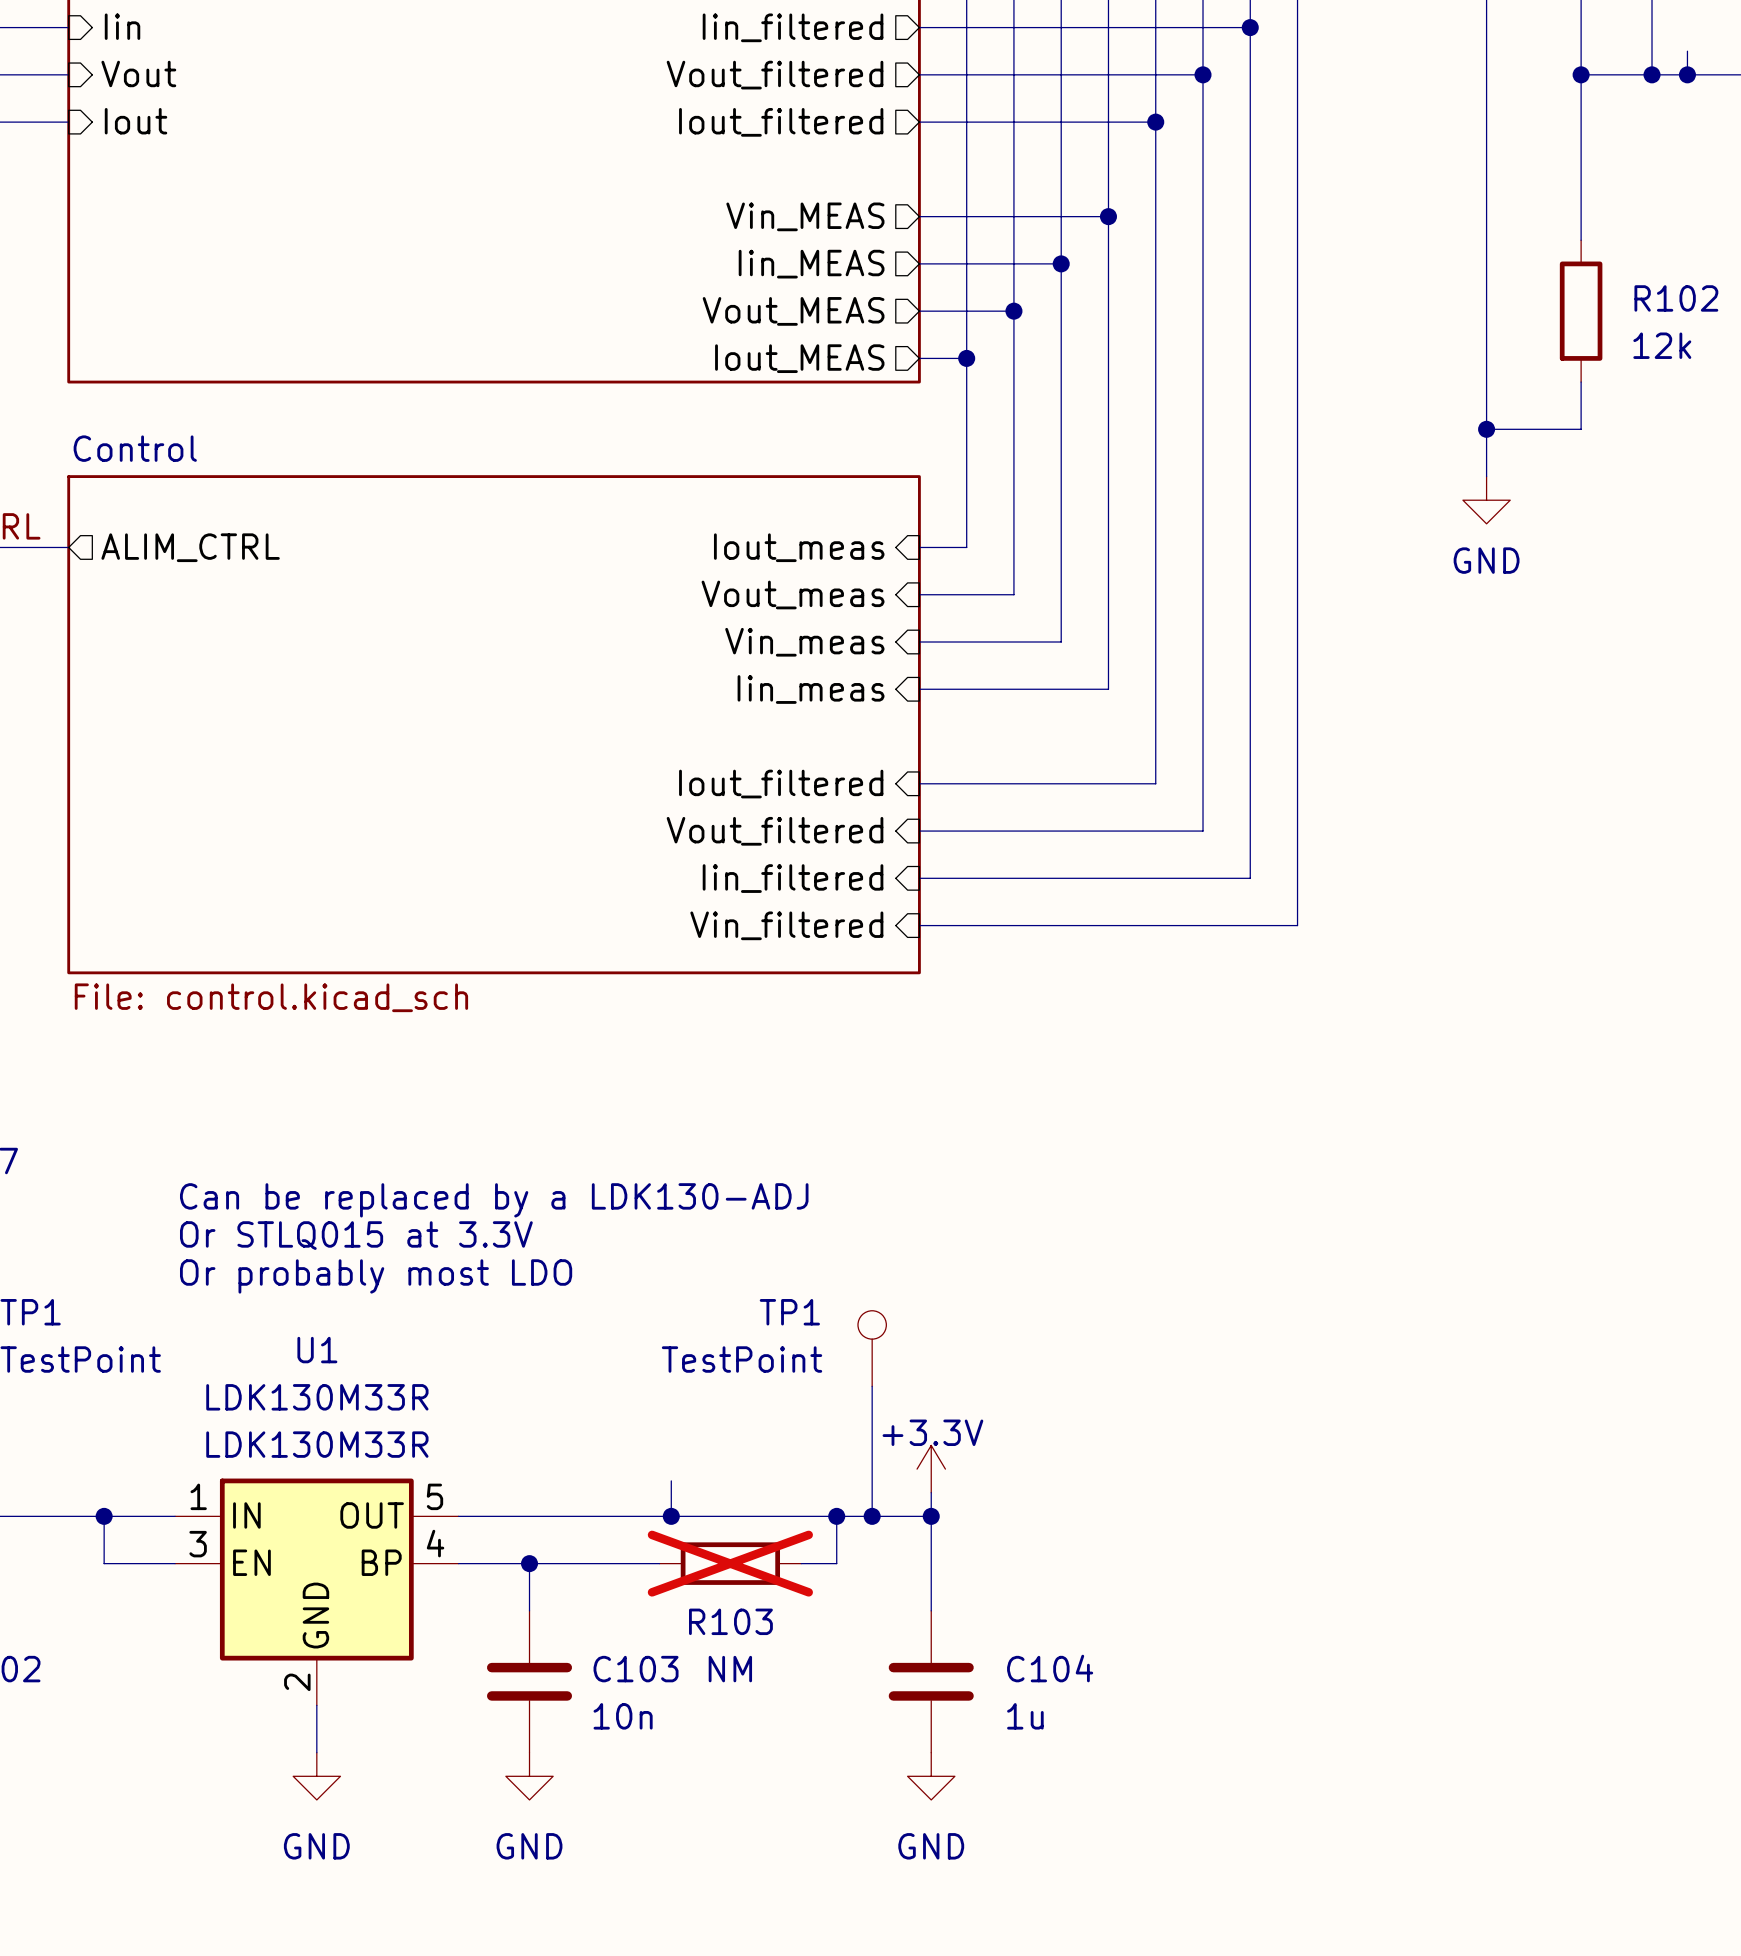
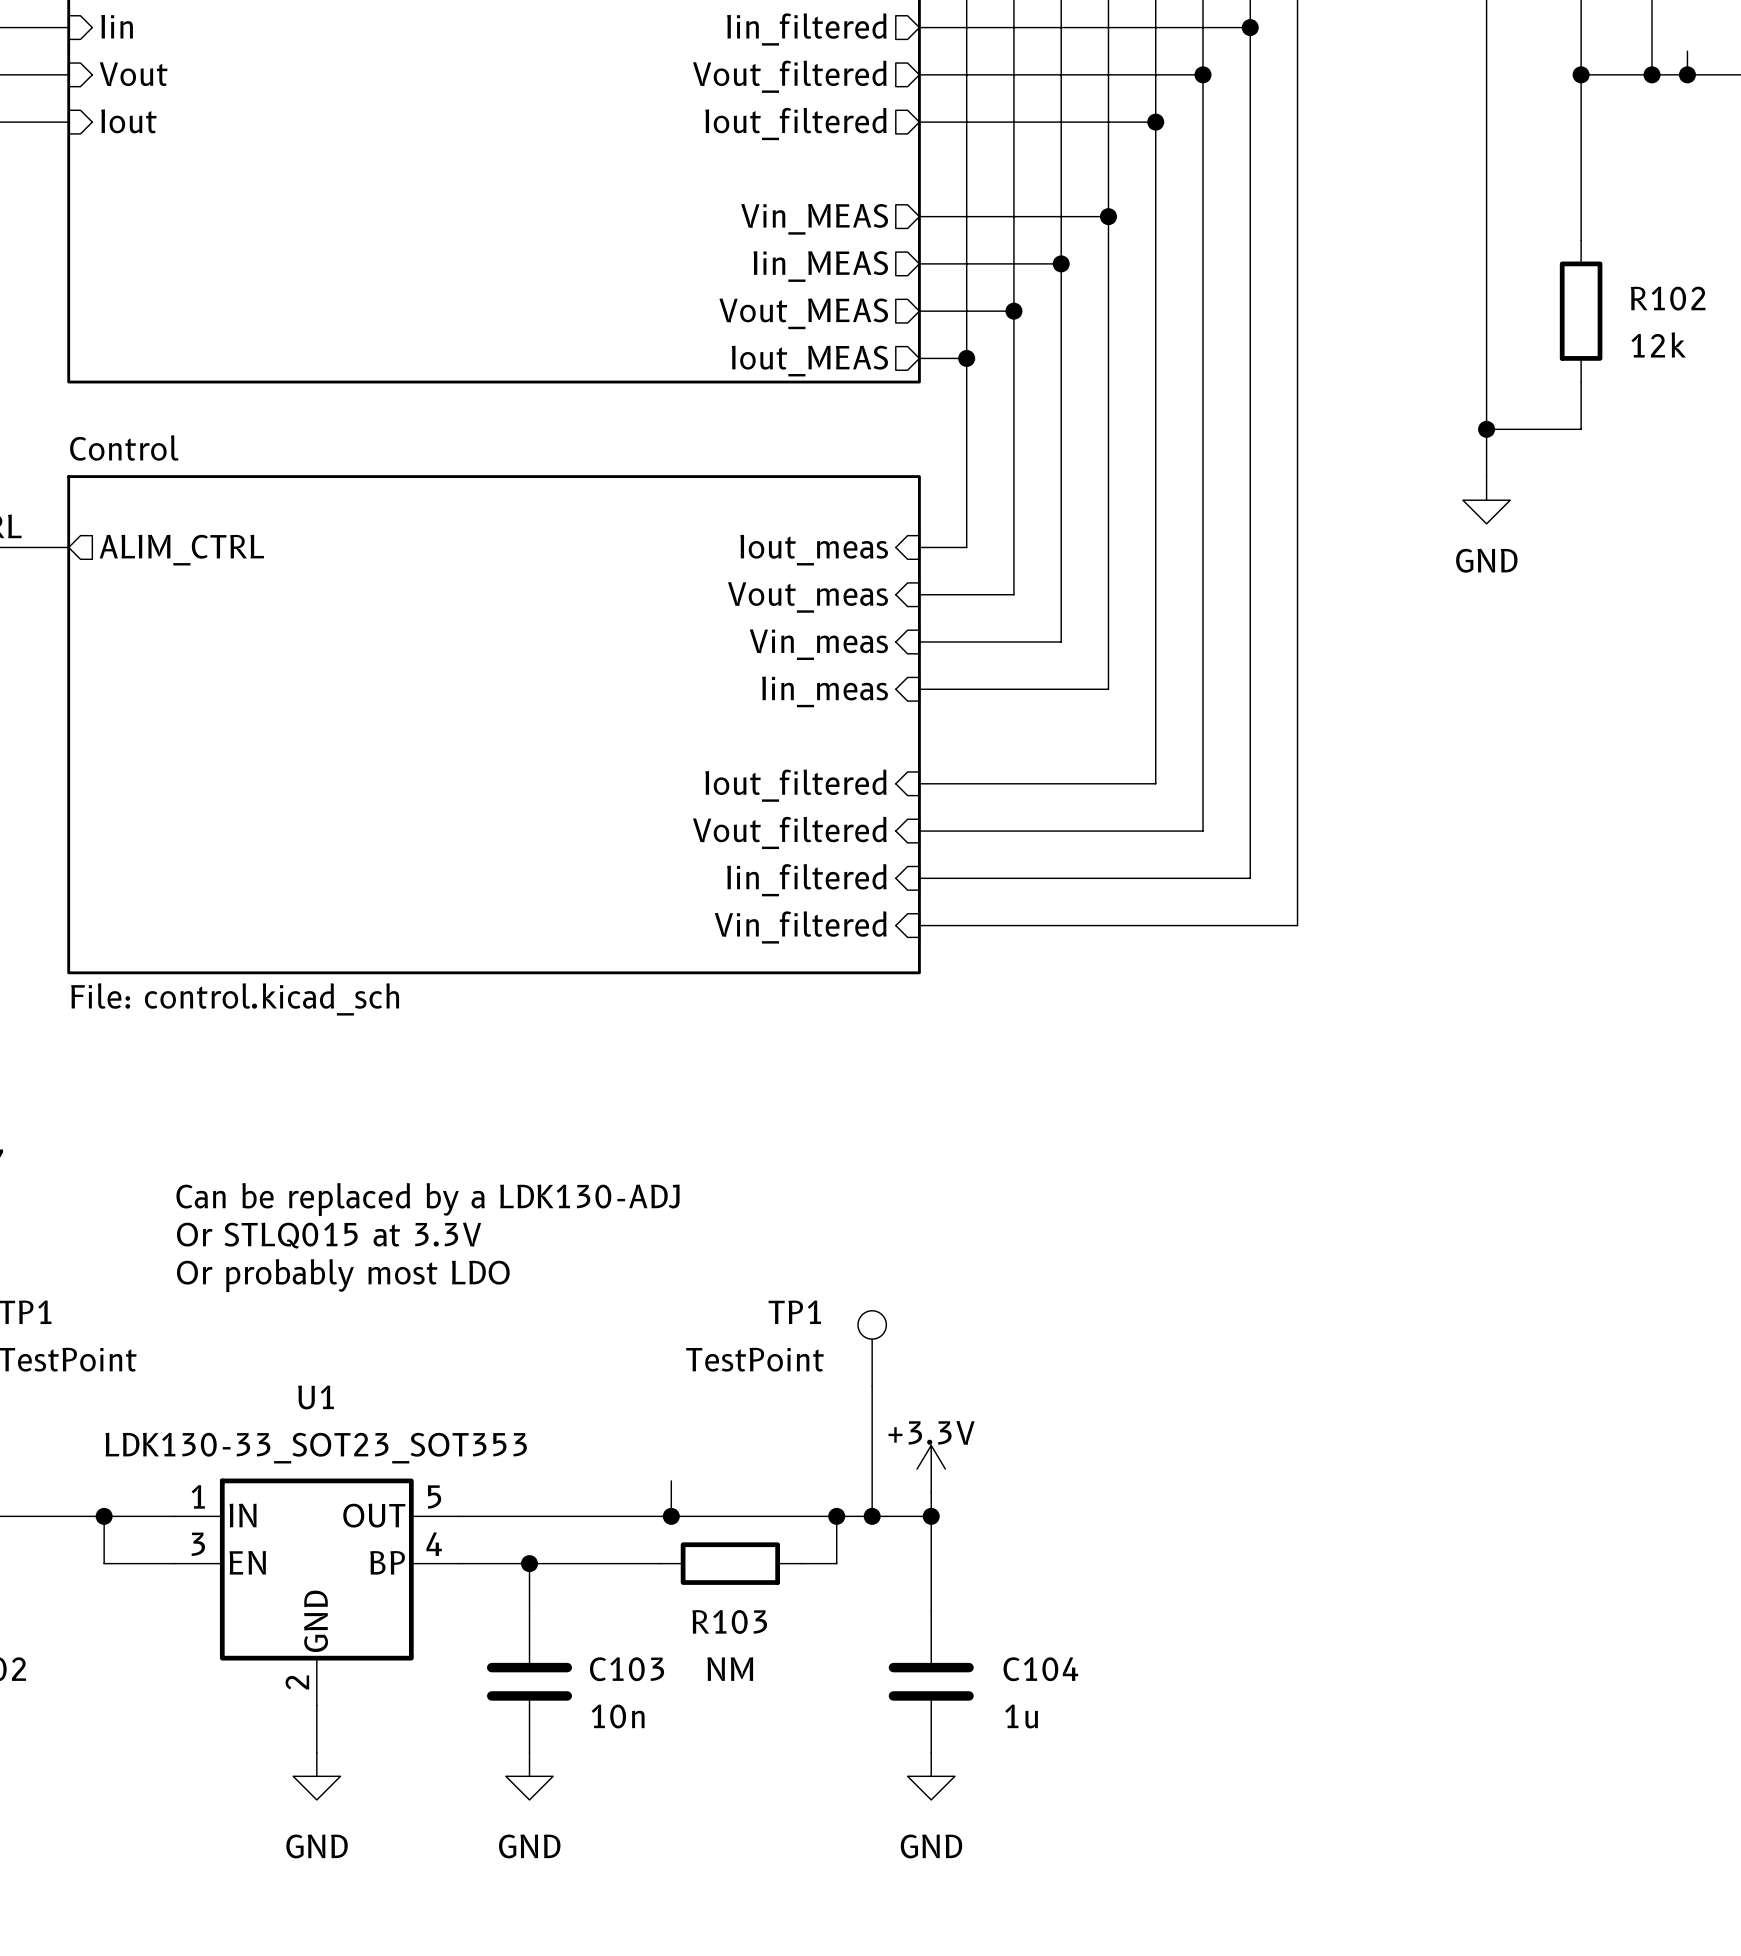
U1 name position: U1 (317, 1350) -> U1 (316, 1397)
U1 value: LDK130M33R (317, 1397) -> LDK130-33_SOT23_SOT353 (316, 1448)
U1 text: LDK130M33R (317, 1444) -> none
R103 do-not-place cross: (730, 1563) -> none

